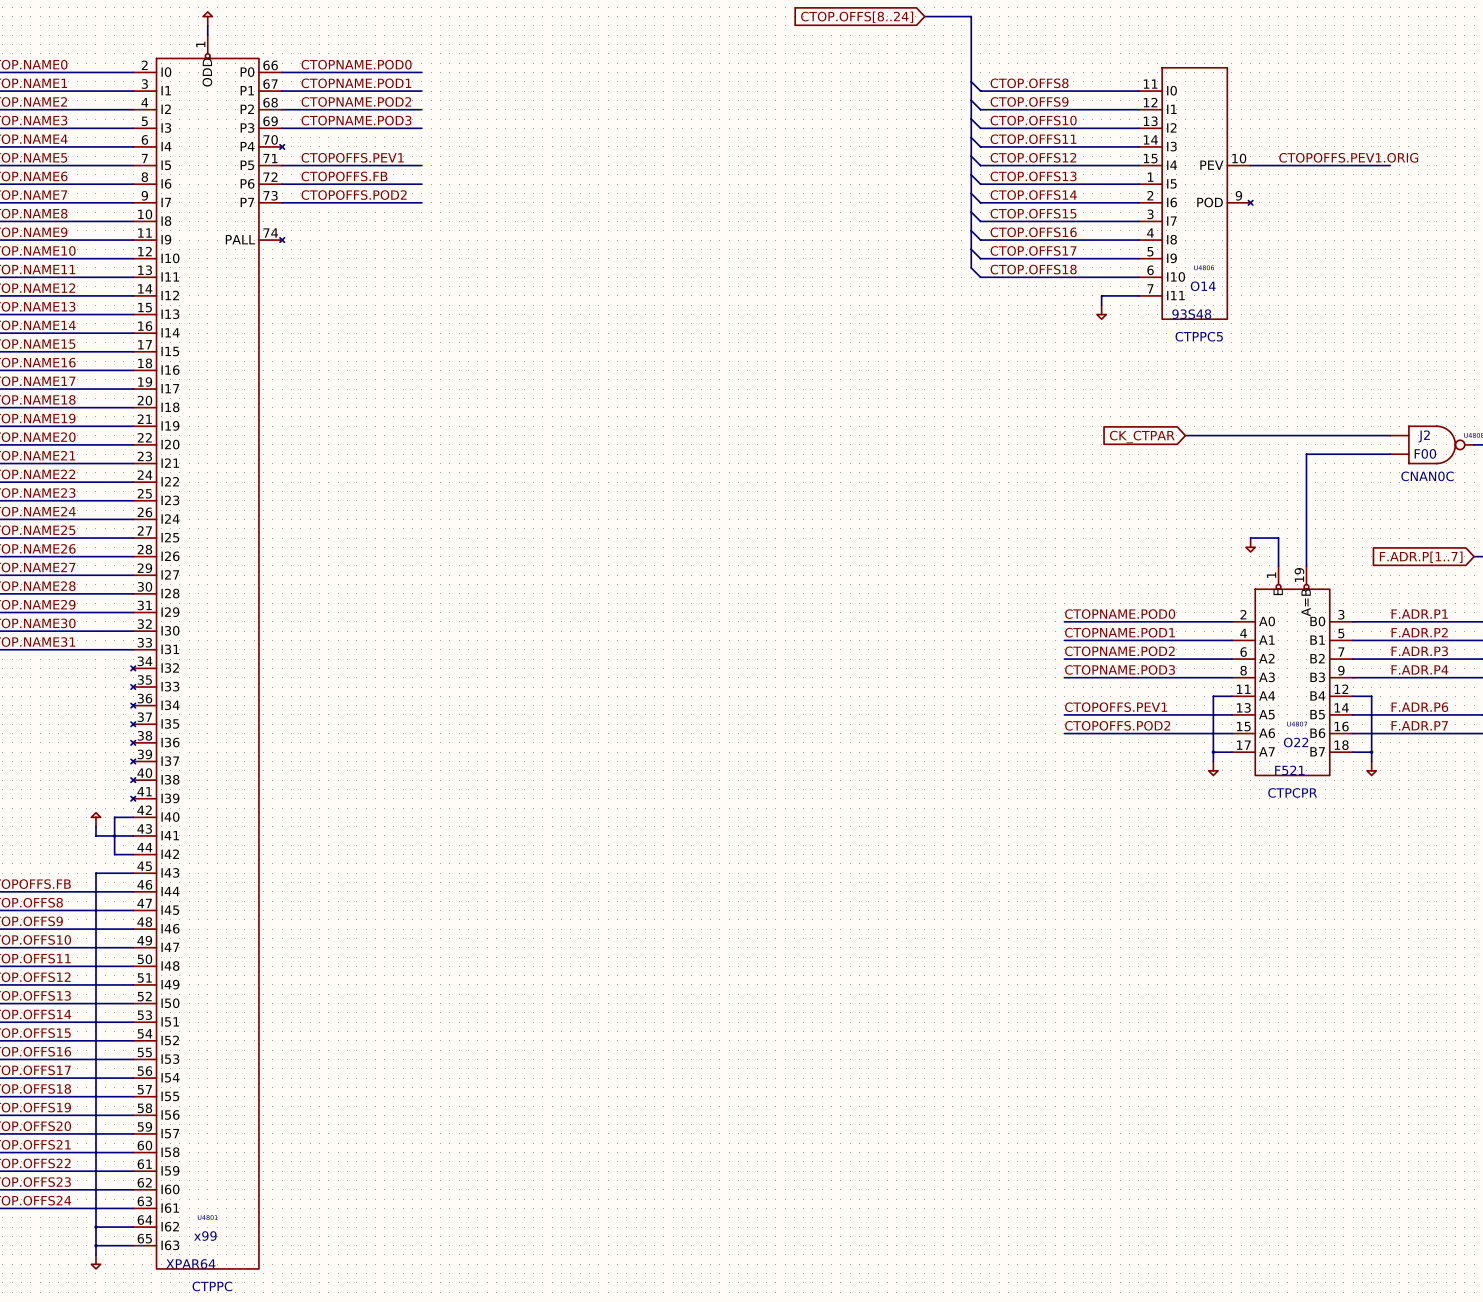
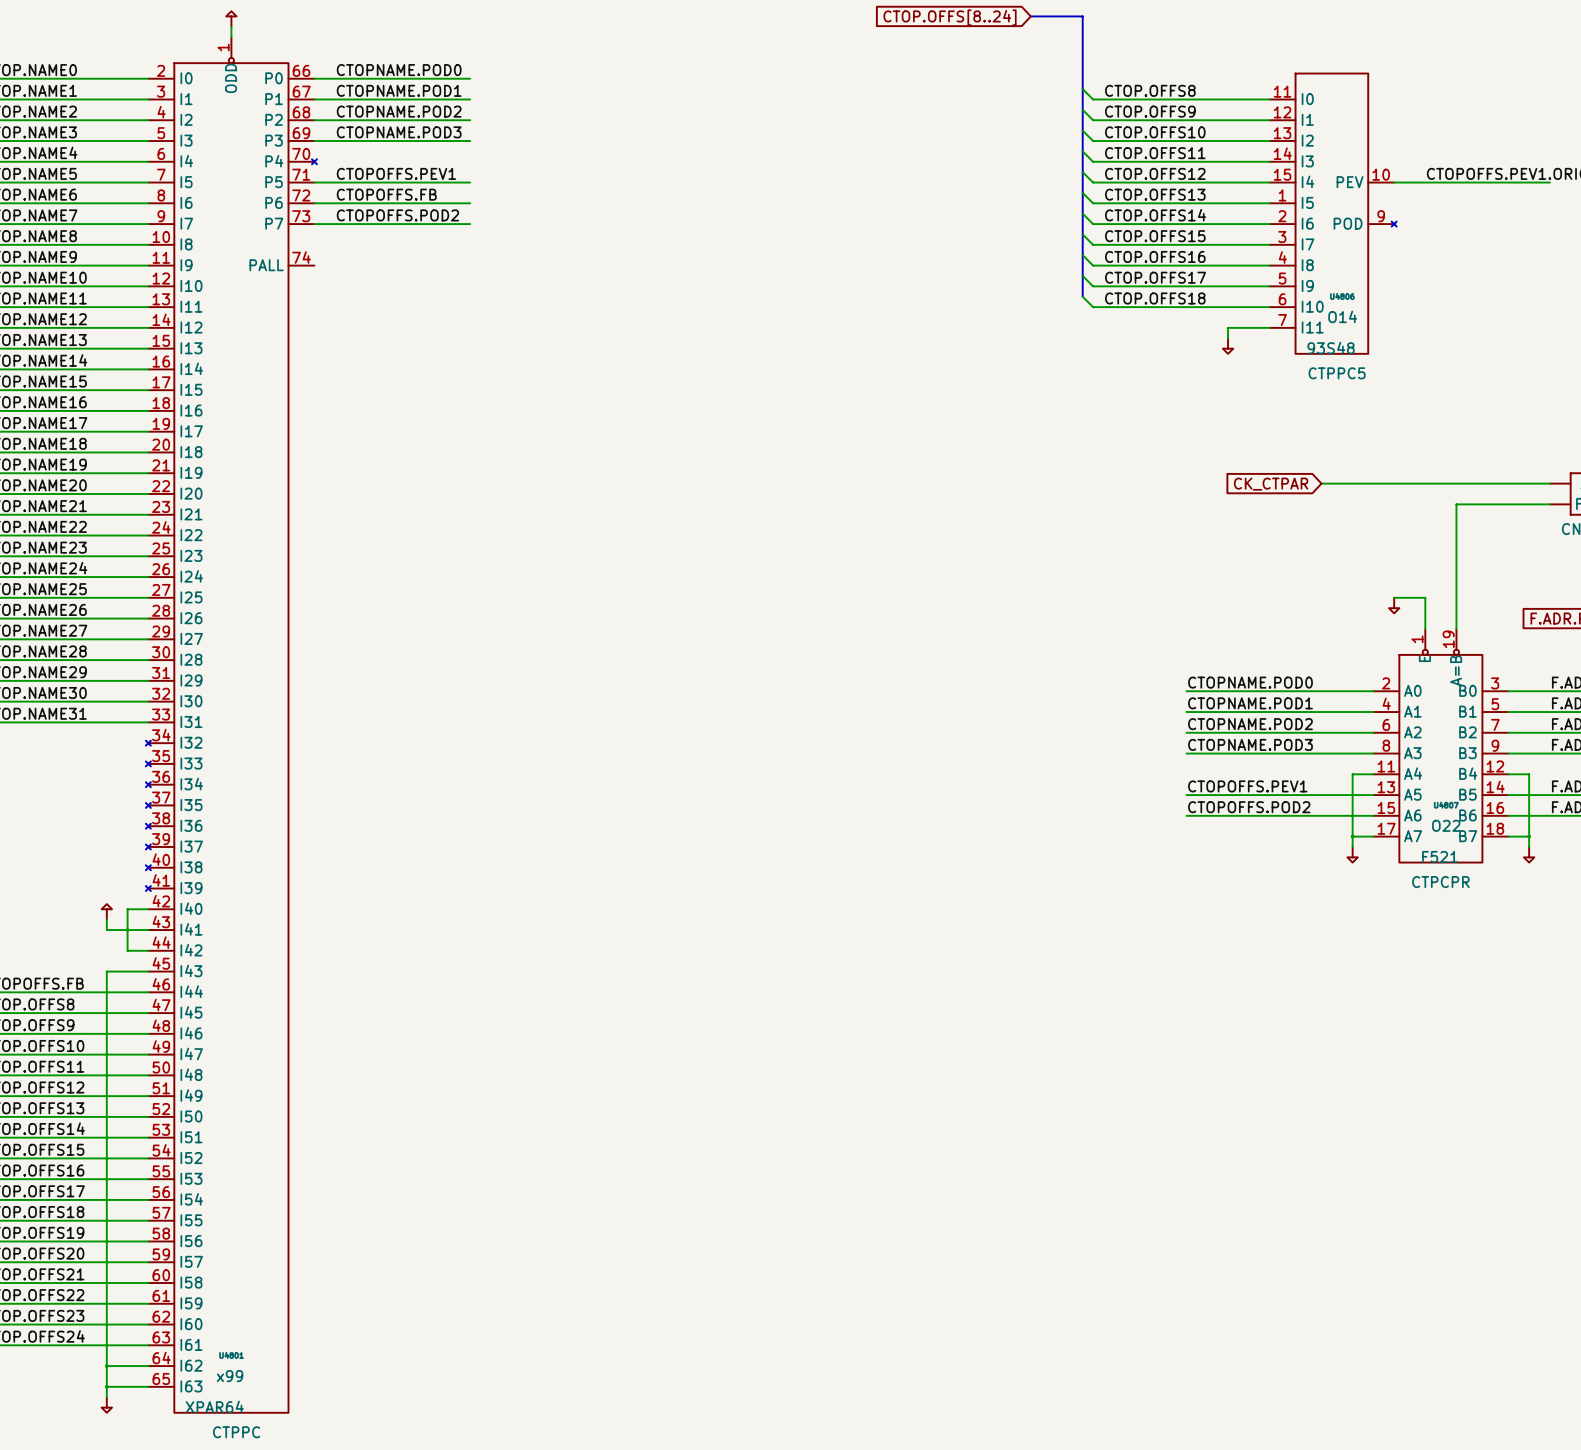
no-connect mark: (282, 240) -> none

